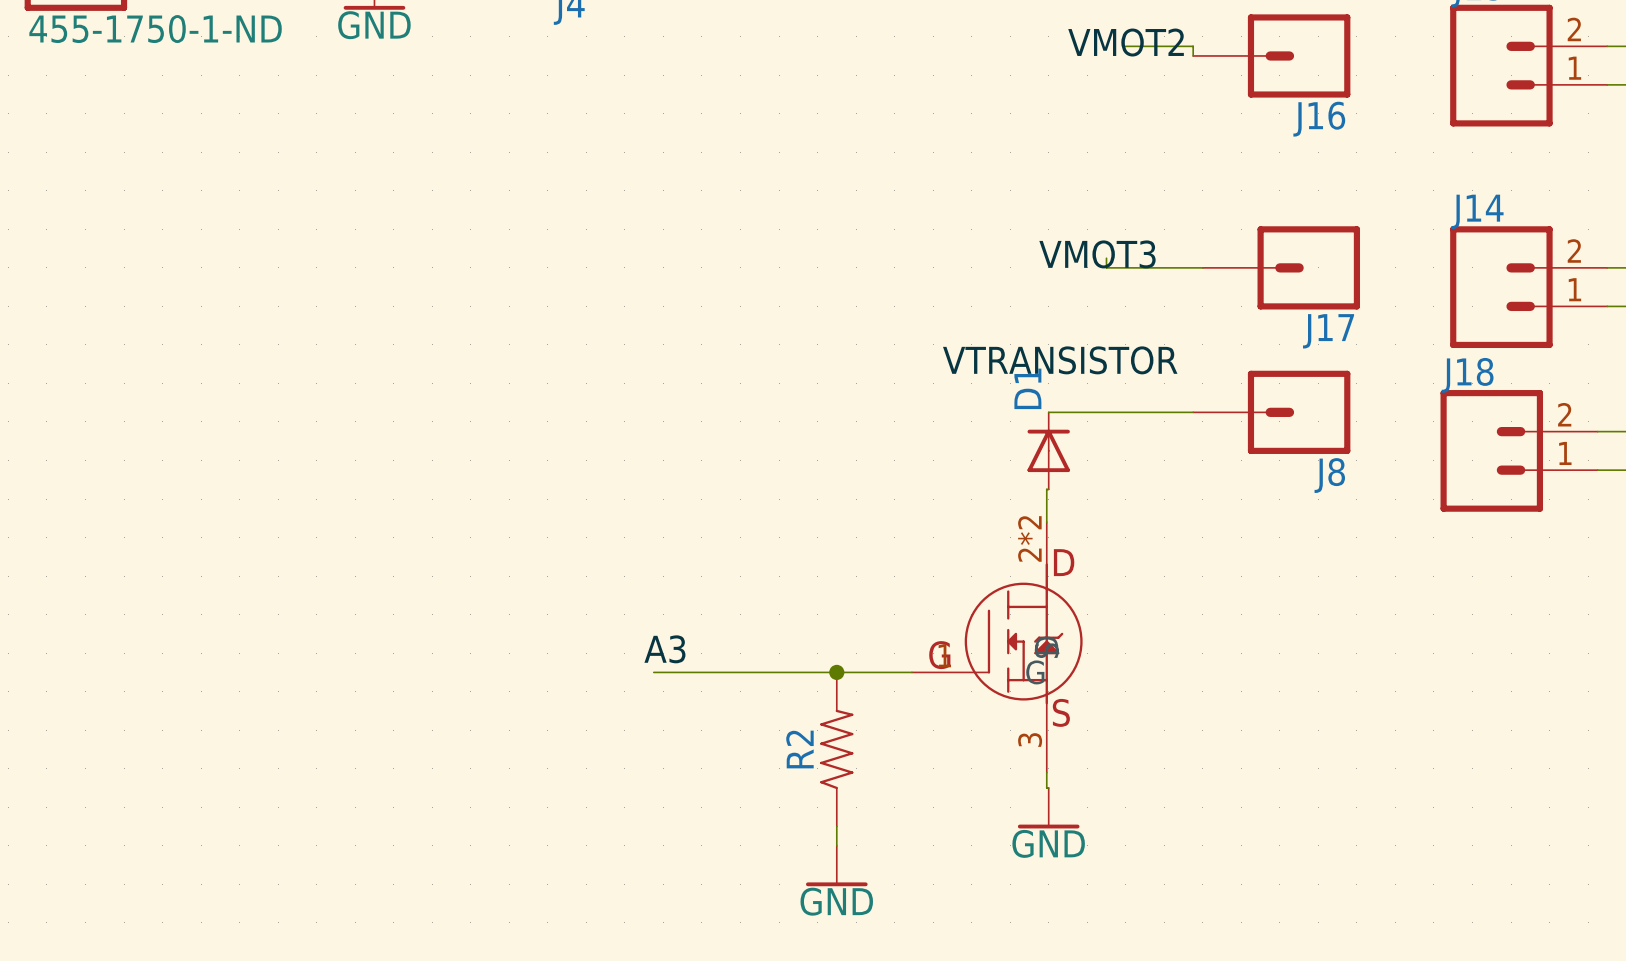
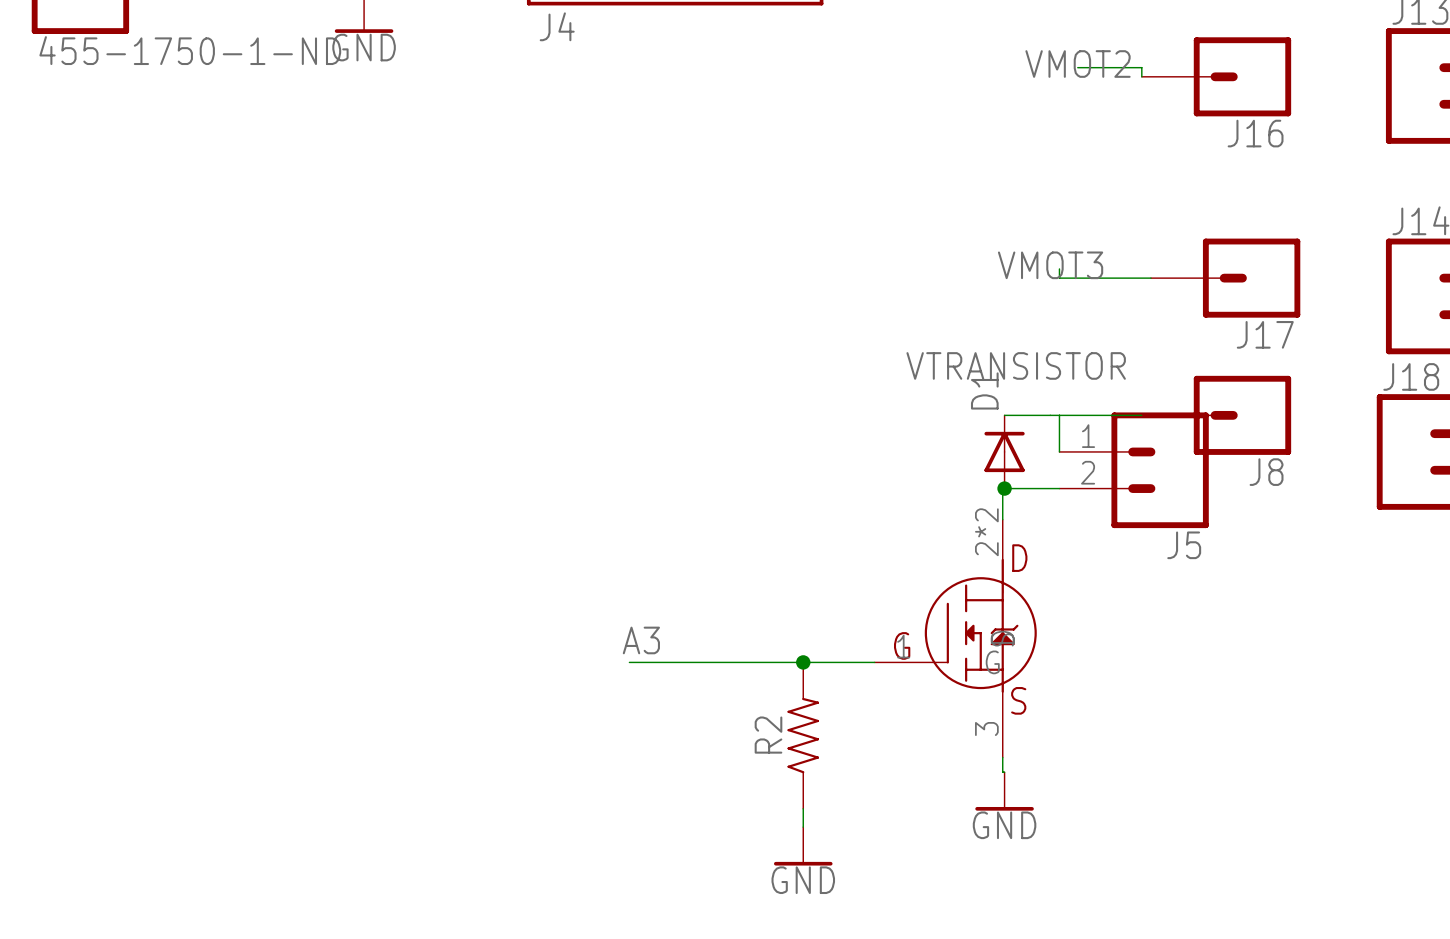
wire: none -> (1059, 415) (1059, 451)
J5: none -> (1134, 470)
wire: none -> (1004, 488) (1059, 488)
junction: none -> (1004, 488)

